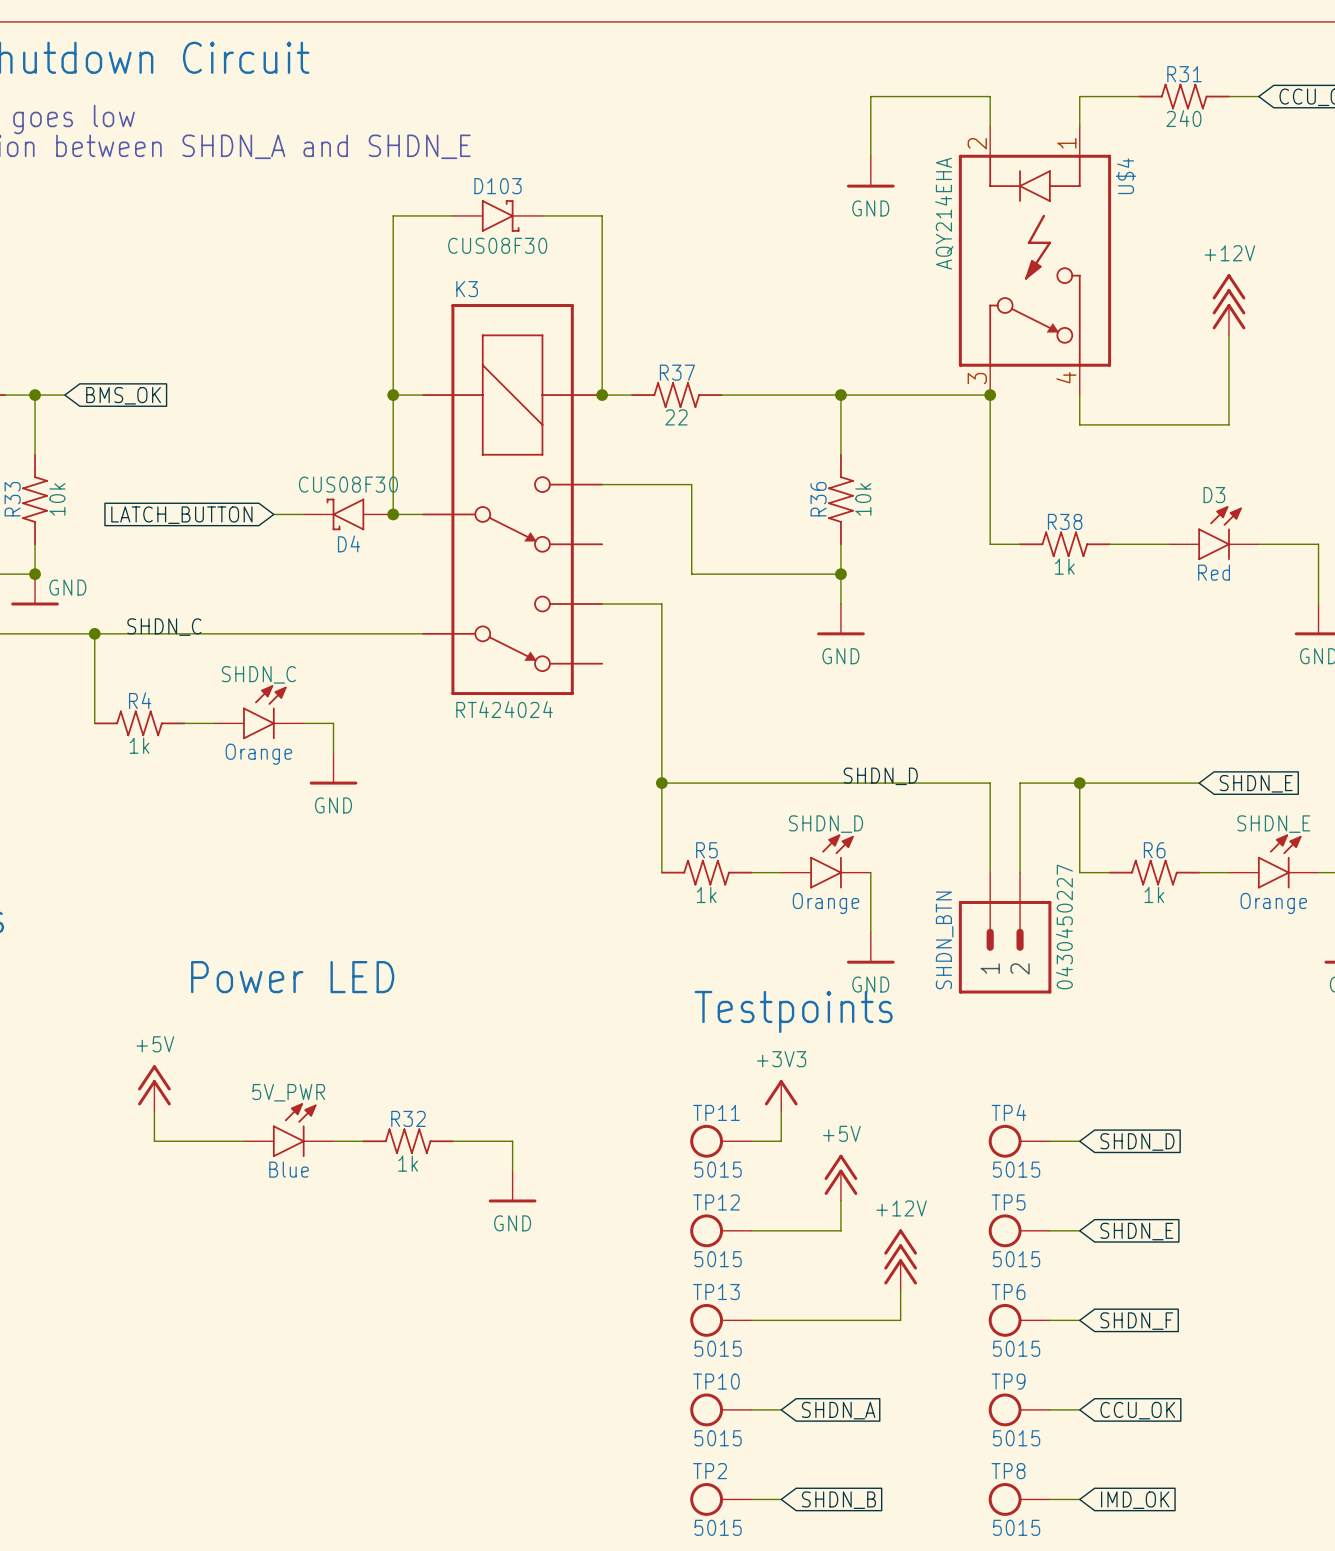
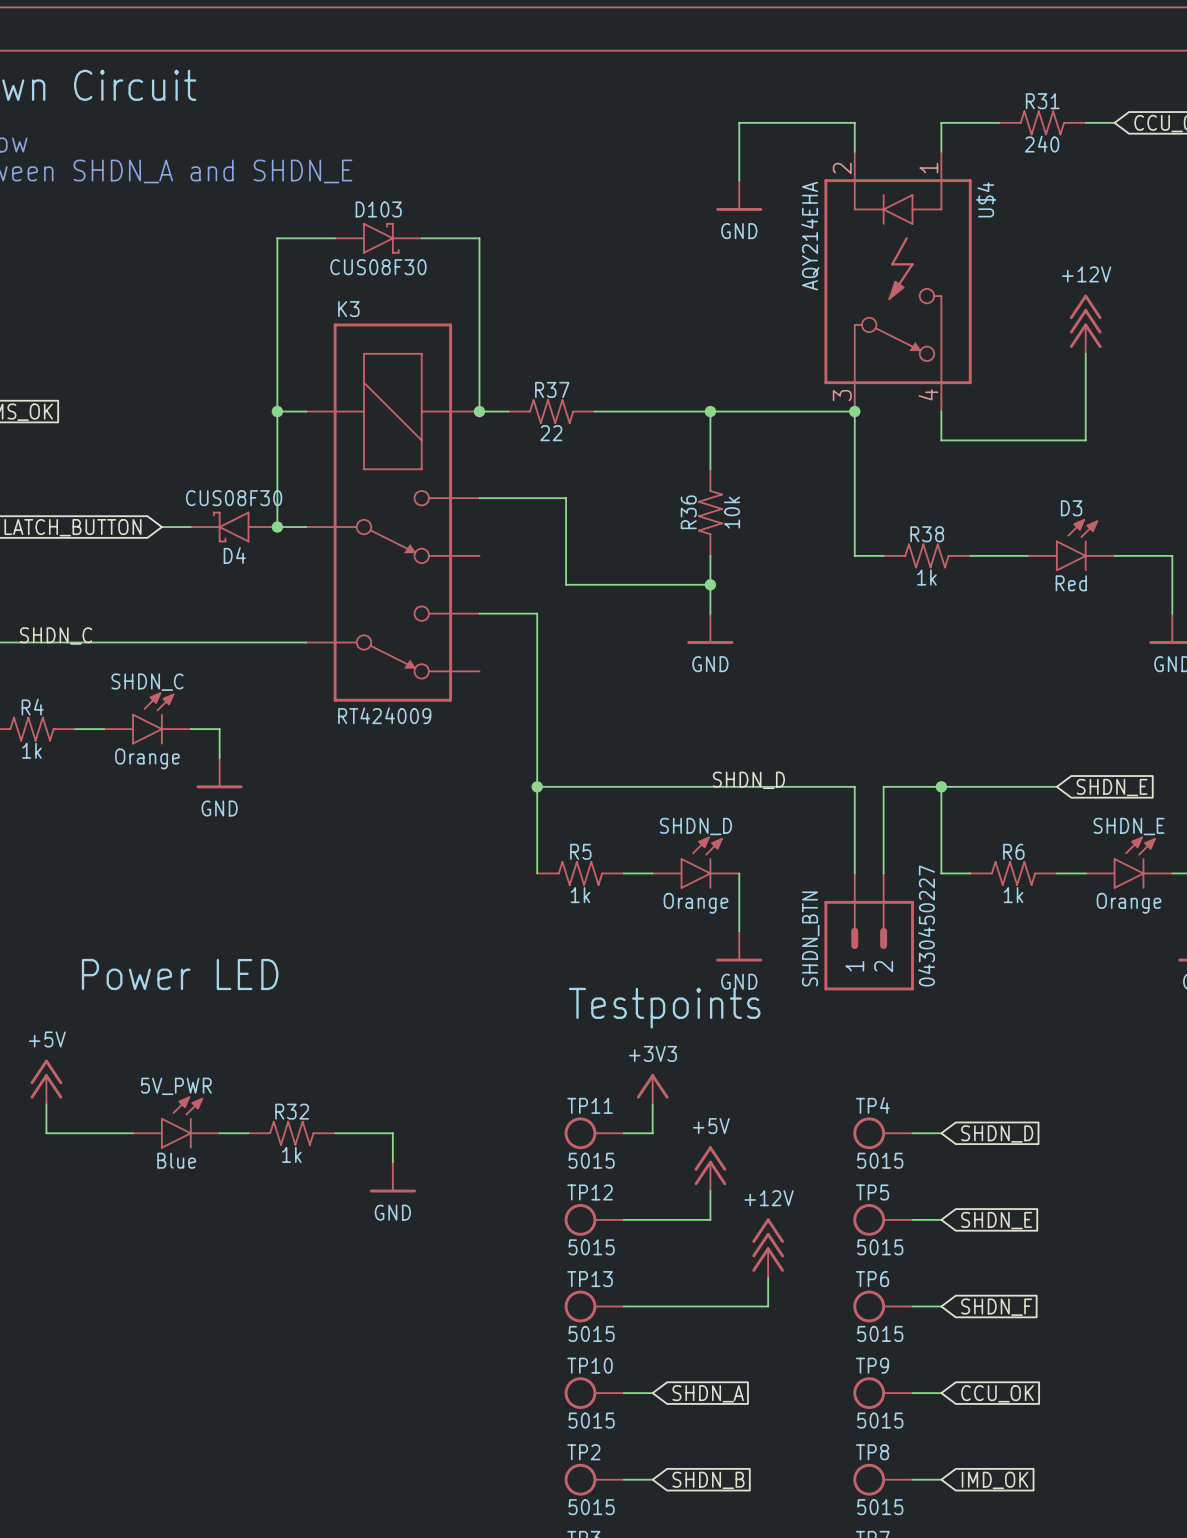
K3 text: RT424024 (504, 709) -> RT424009 (384, 715)

